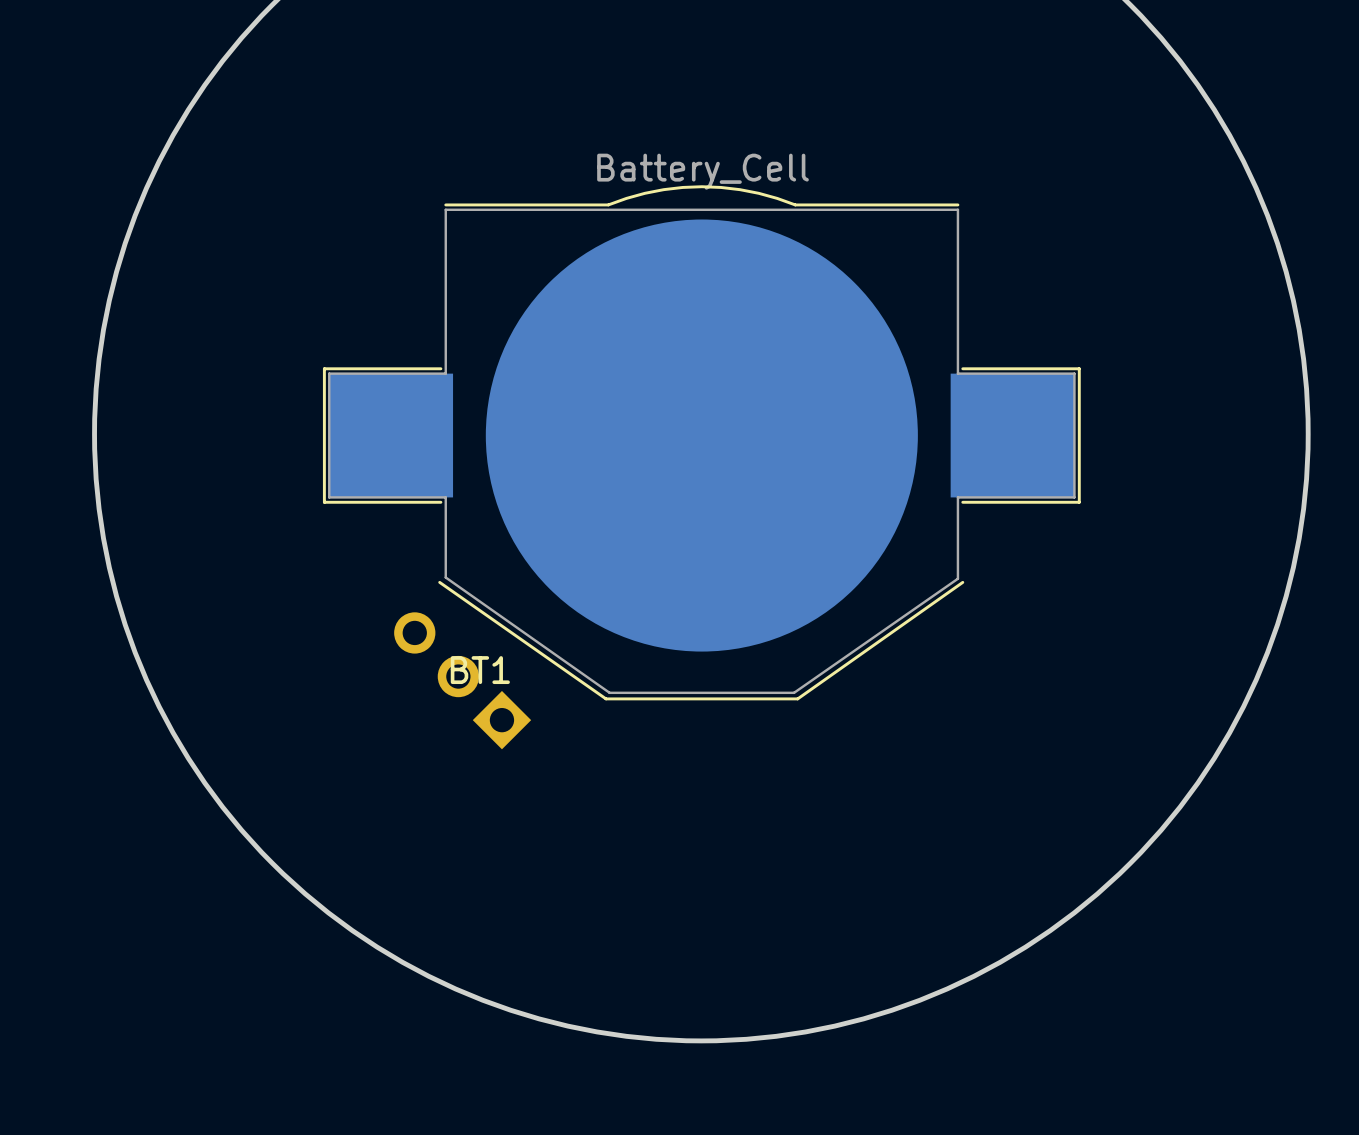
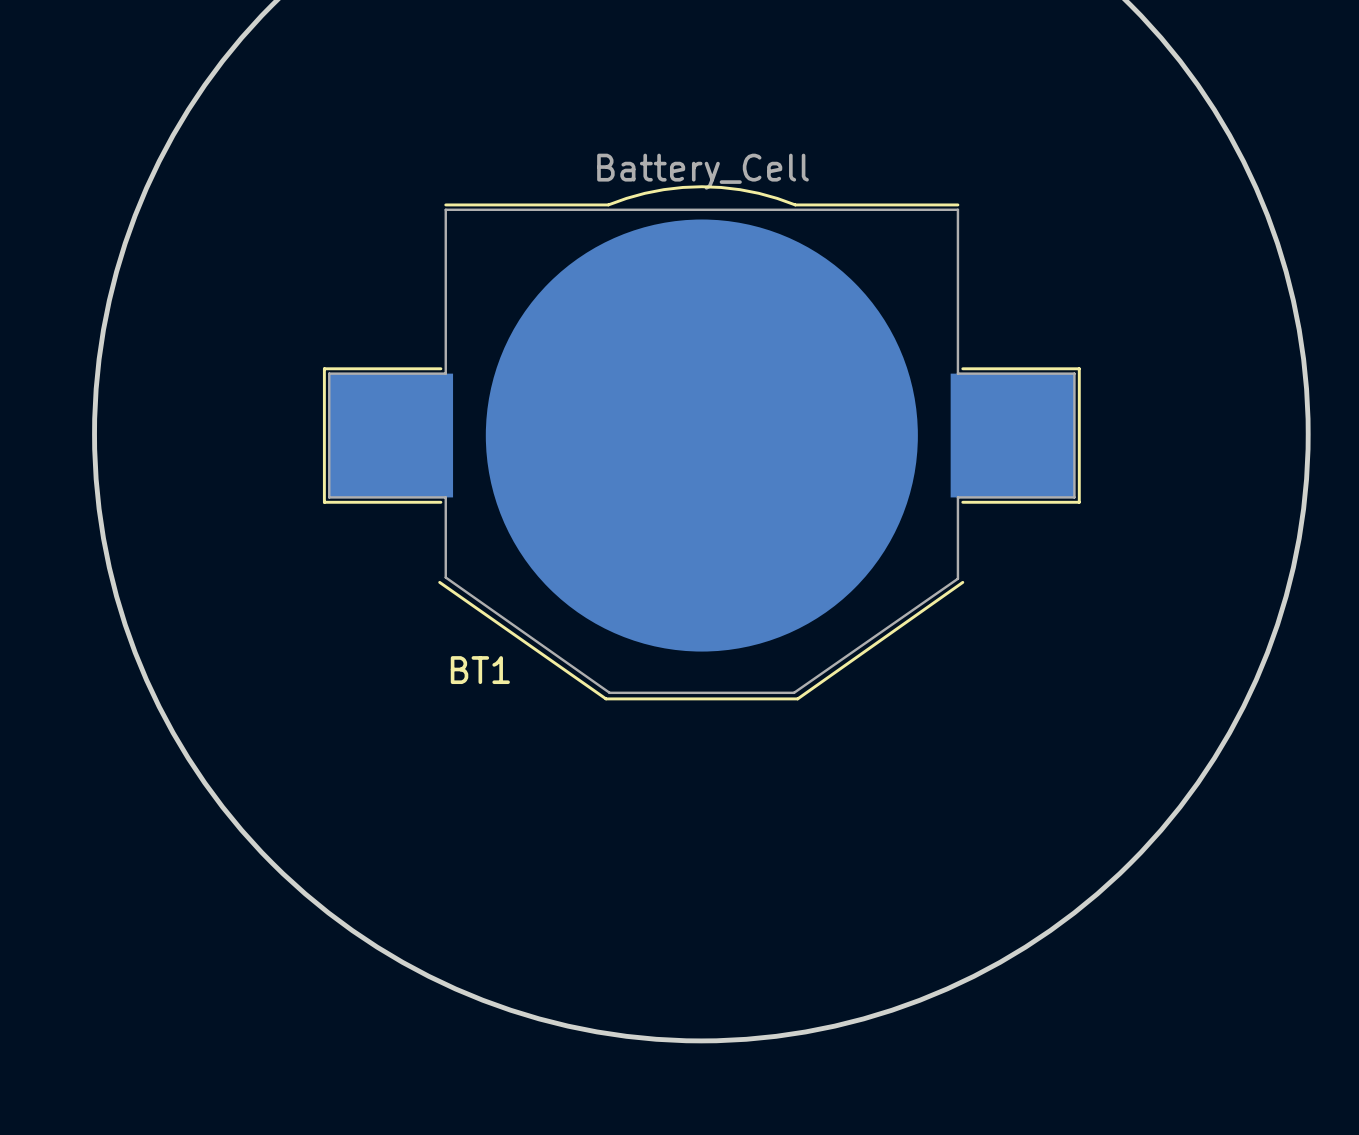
part: (462, 680) -> none

